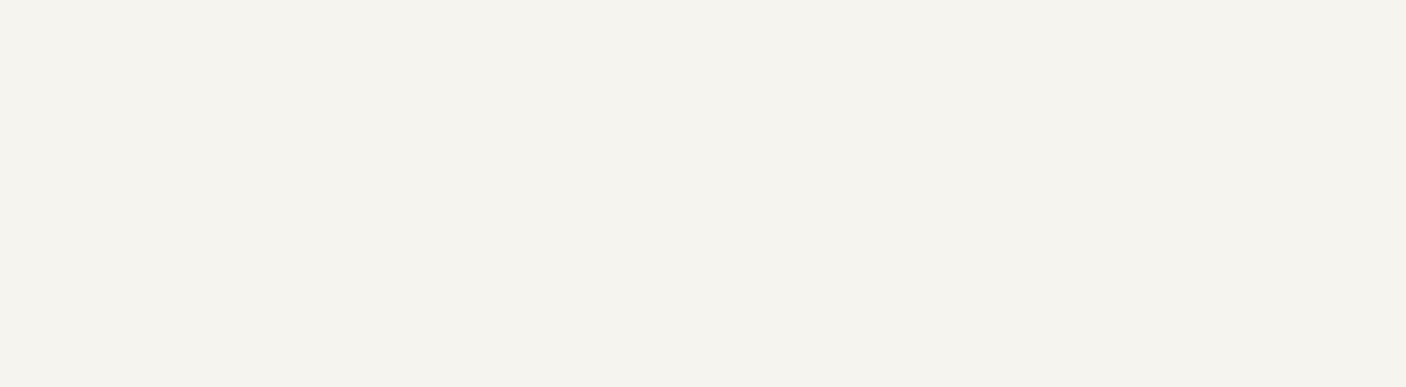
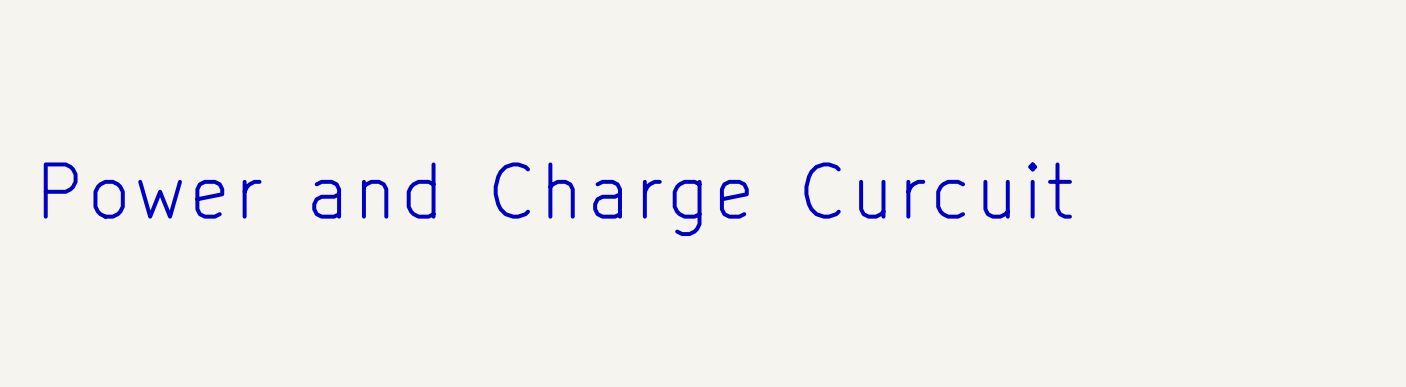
text: none -> Power and Charge Curcuit (557, 199)

